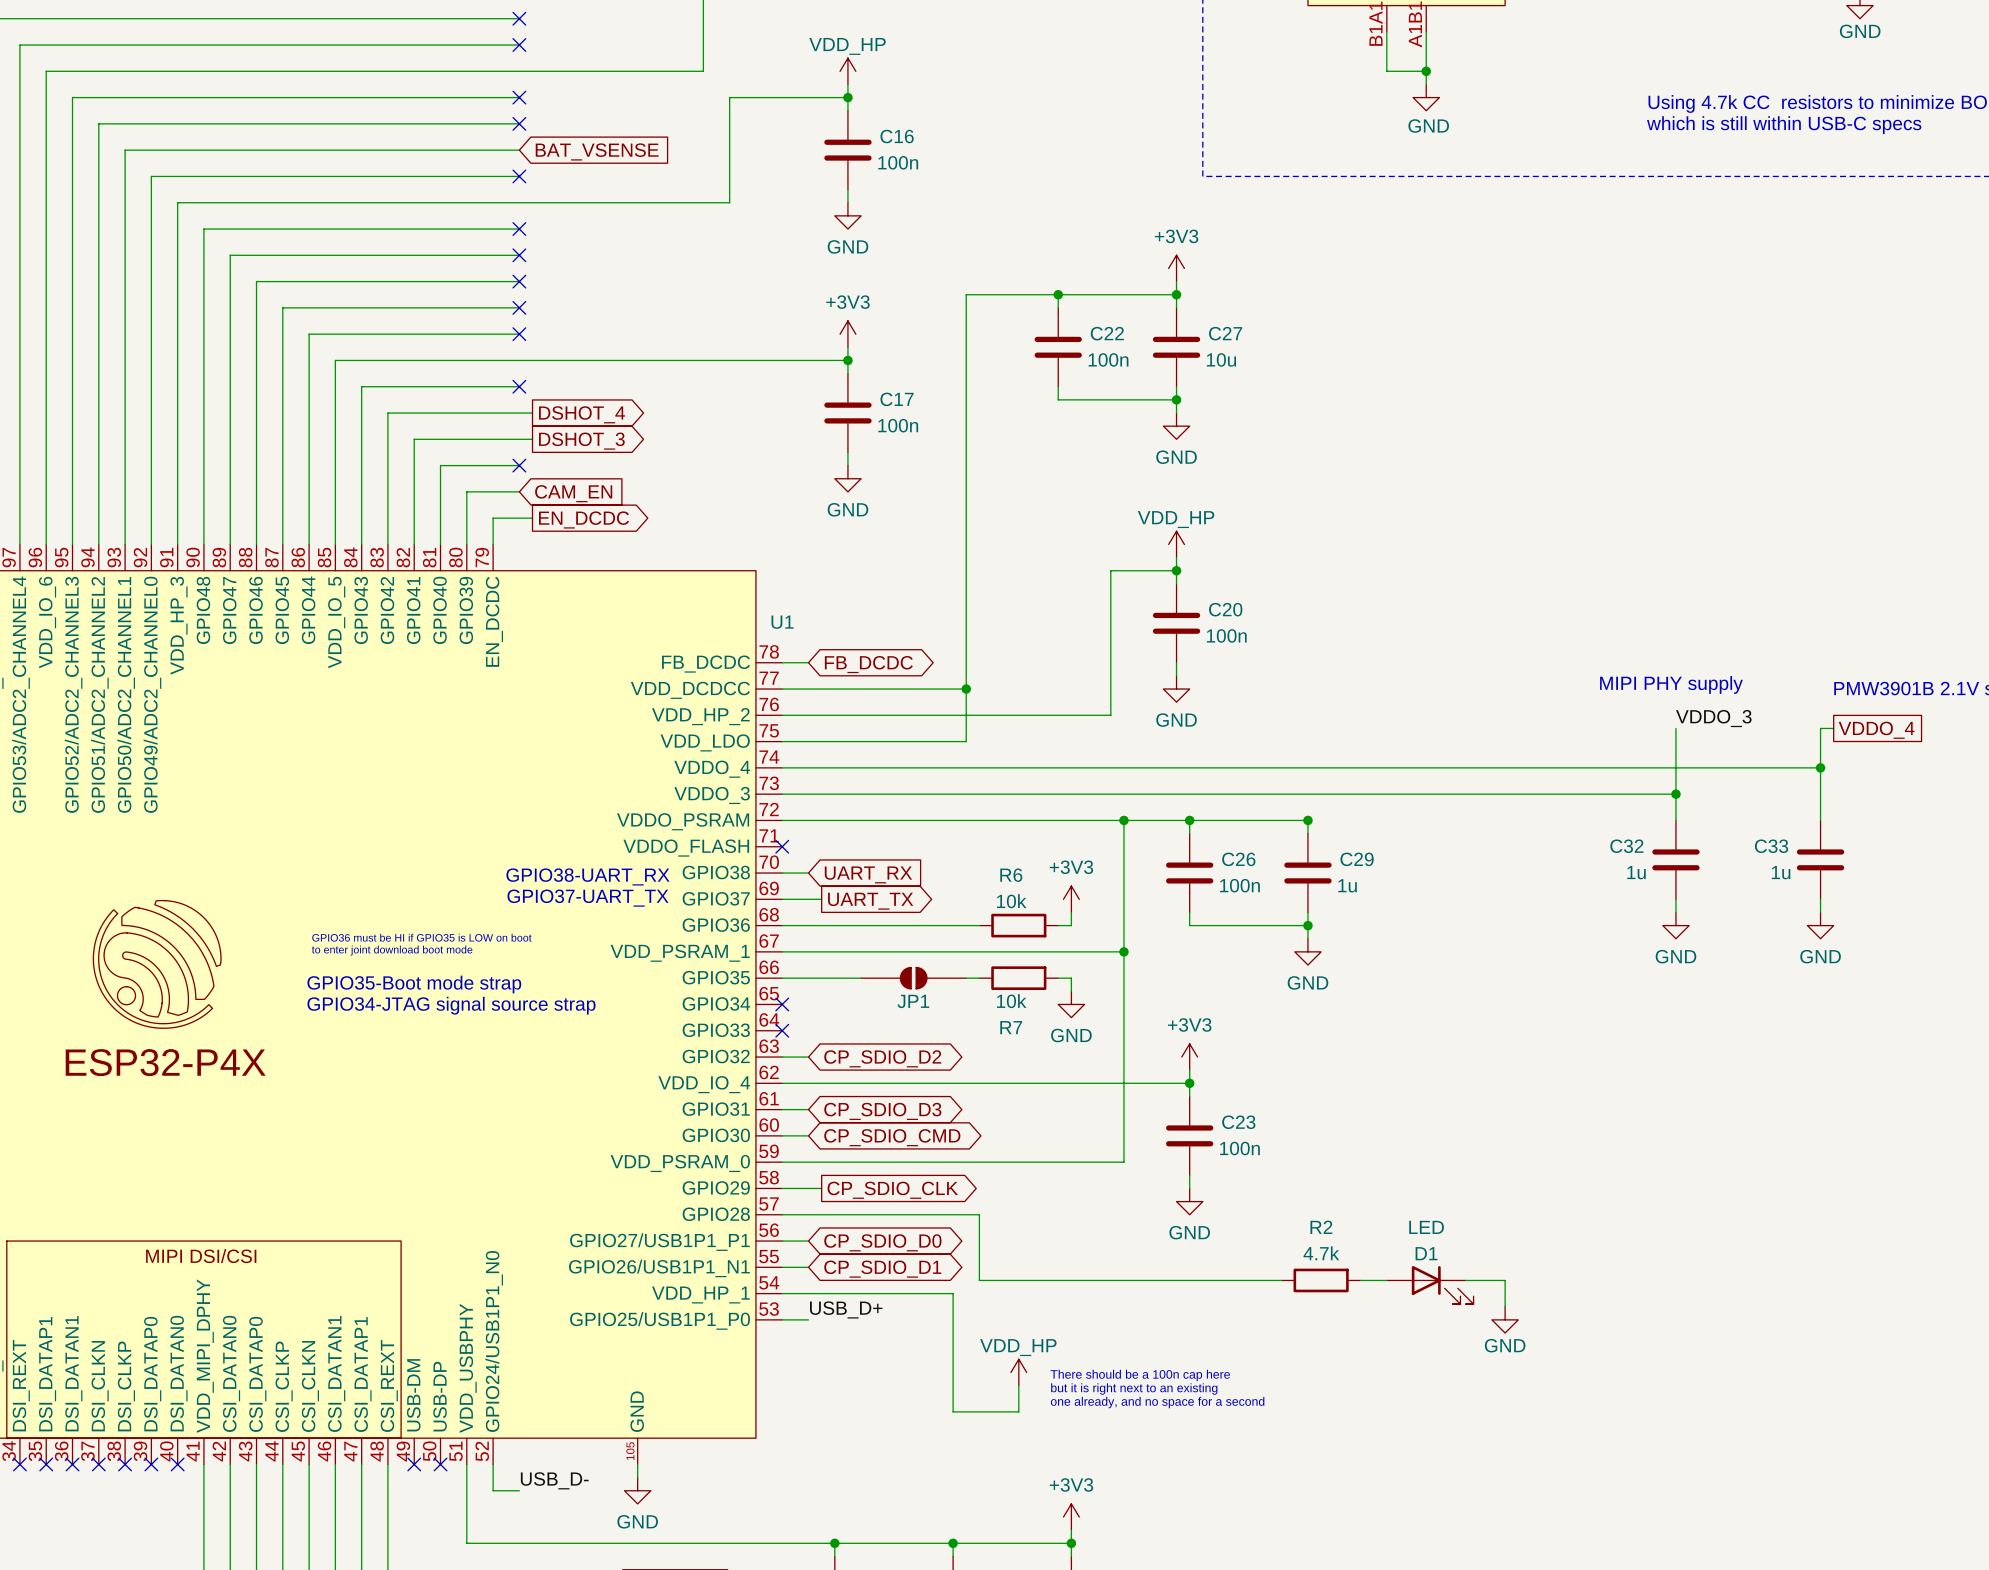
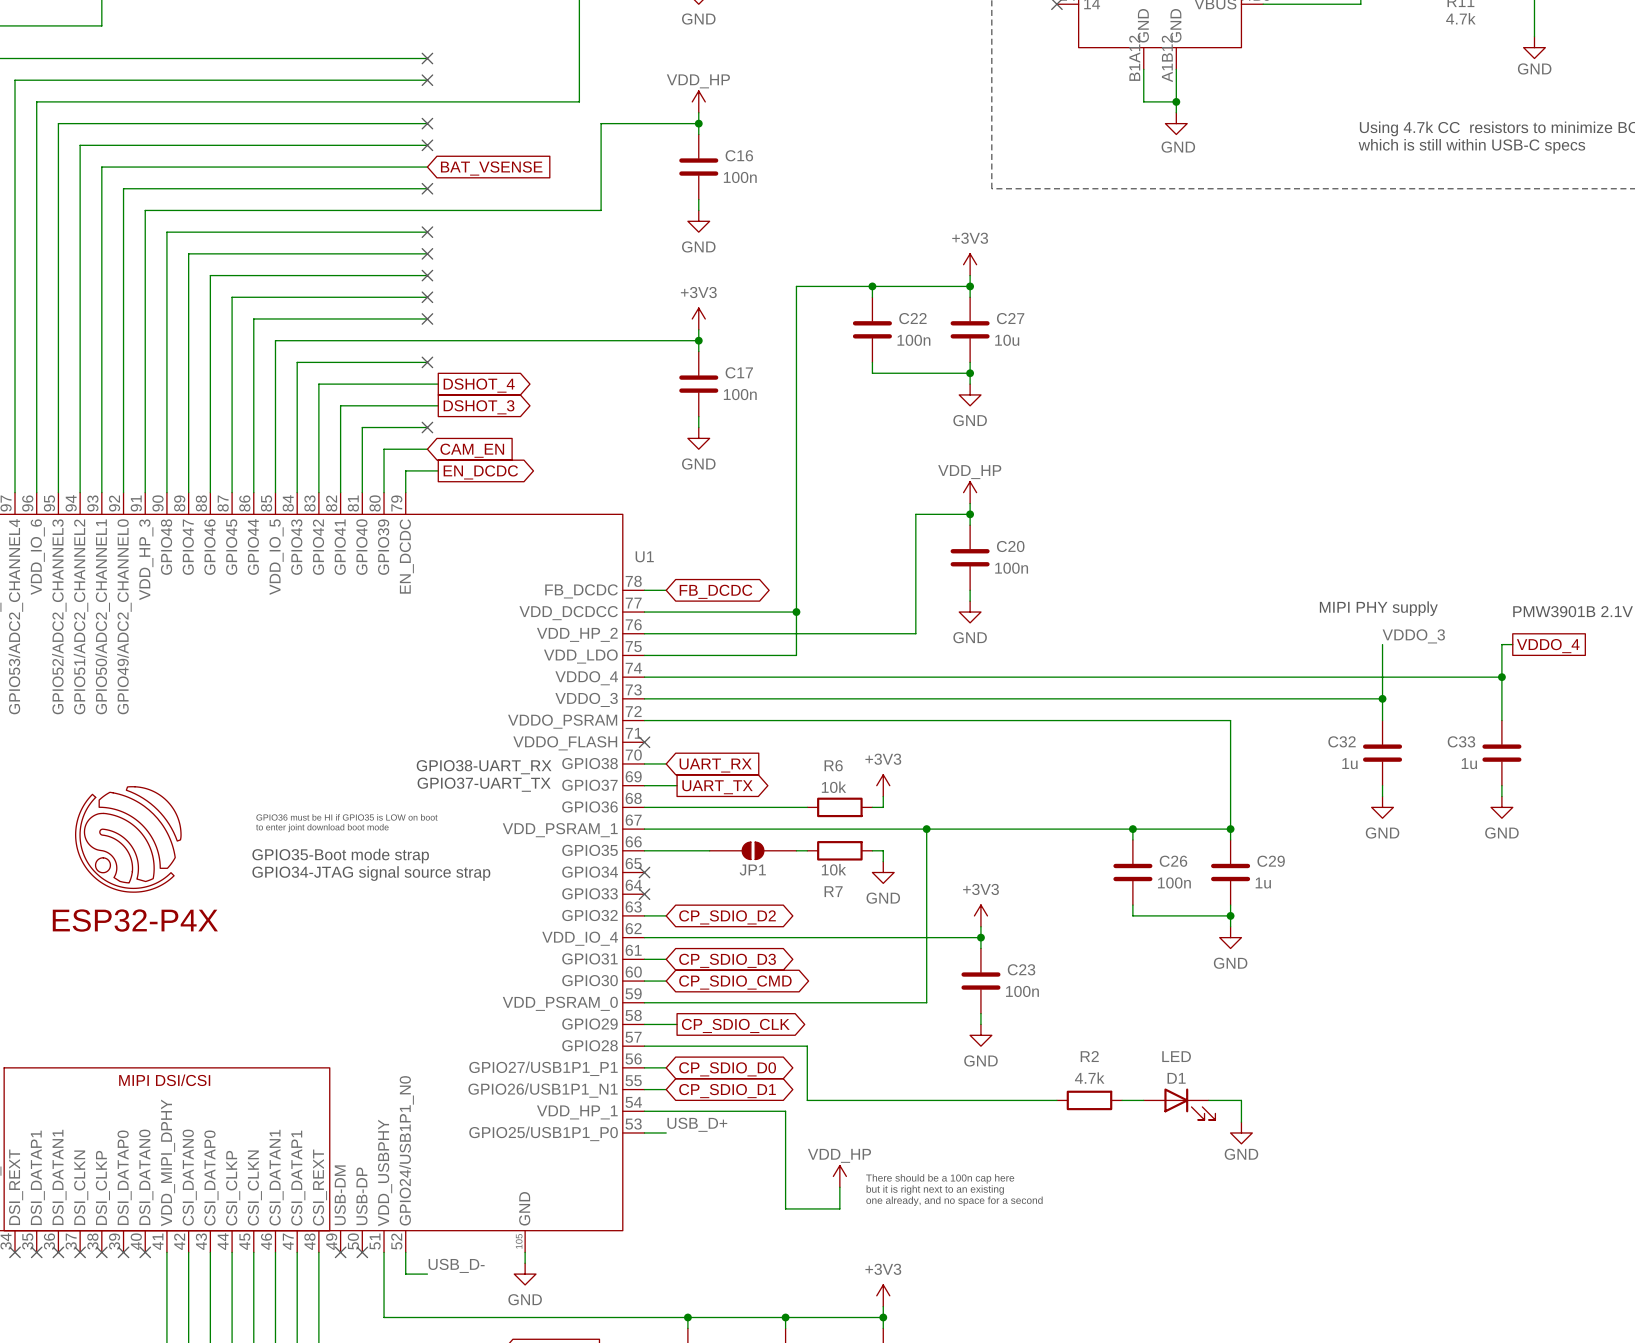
wire: (1123, 820) (1123, 951) -> (1230, 829) (926, 829)
junction: (1123, 820) -> none
wire: (1189, 820) (1189, 833) -> (1132, 829) (1132, 839)
junction: (1189, 820) -> none
wire: (1307, 820) (1307, 833) -> (1078, 720) (1230, 720) (1230, 839)
junction: (1307, 820) -> none
C26 position: (1189, 873) -> (1132, 872)
C29 position: (1307, 873) -> (1230, 872)
wire: (1189, 912) (1189, 925) (1307, 925) -> (1132, 905) (1132, 915) (1230, 915)
wire: (1307, 912) (1307, 938) -> (1230, 905) (1230, 926)
junction: (1307, 925) -> none
power symbol position: GND (1307, 951) -> GND (1230, 937)
junction: none -> (1132, 829)
junction: none -> (1230, 829)
junction: none -> (1230, 915)

